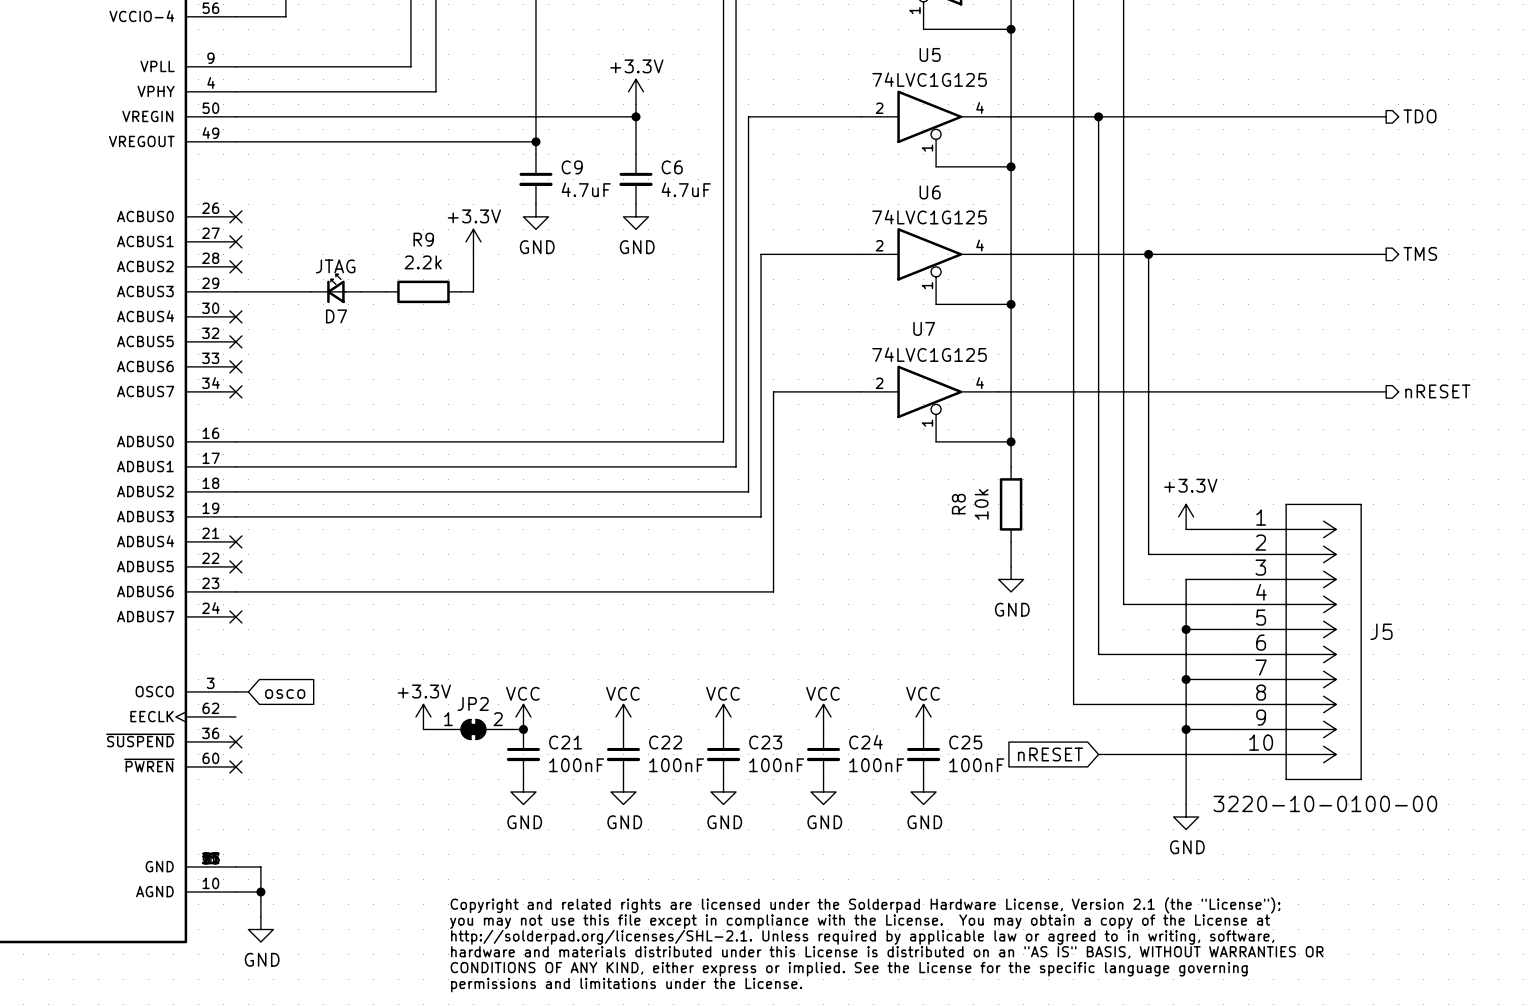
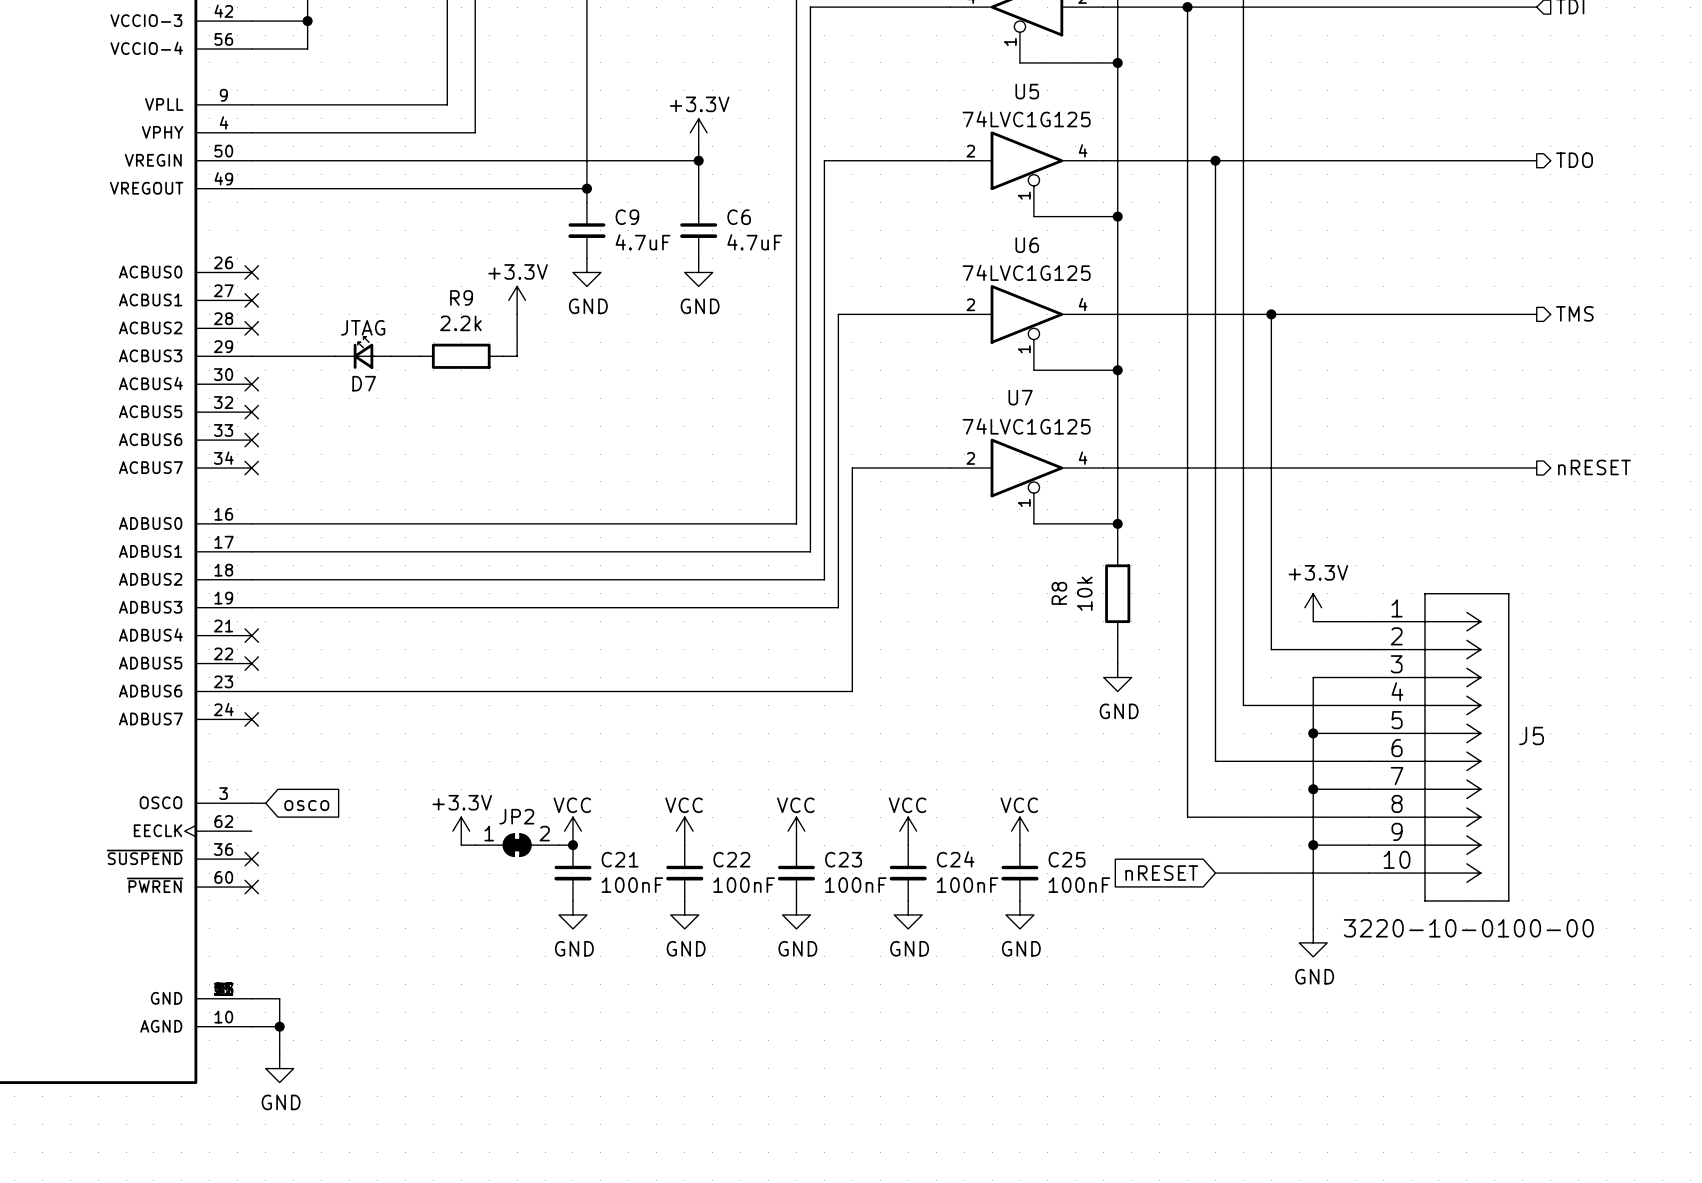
text: Copyright and related rights are licensed under the Solderpad Hardware License, Version 2.1 (the "License"); (865, 905) -> none
text: you may not use this file except in compliance with the License. You may obtain a copy of the License at (860, 921) -> none
text: http://solderpad.org/licenses/SHL-2.1. Unless required by applicable law or agreed to in writing, software, (862, 937) -> none
text: hardware and materials distributed under this License is distributed on an "AS IS" BASIS, WITHOUT WARRANTIES OR (887, 952) -> none
text: CONDITIONS OF ANY KIND, either express or implied. See the License for the specific language governing (849, 969) -> none
text: permissions and limitations under the License. (626, 985) -> none

